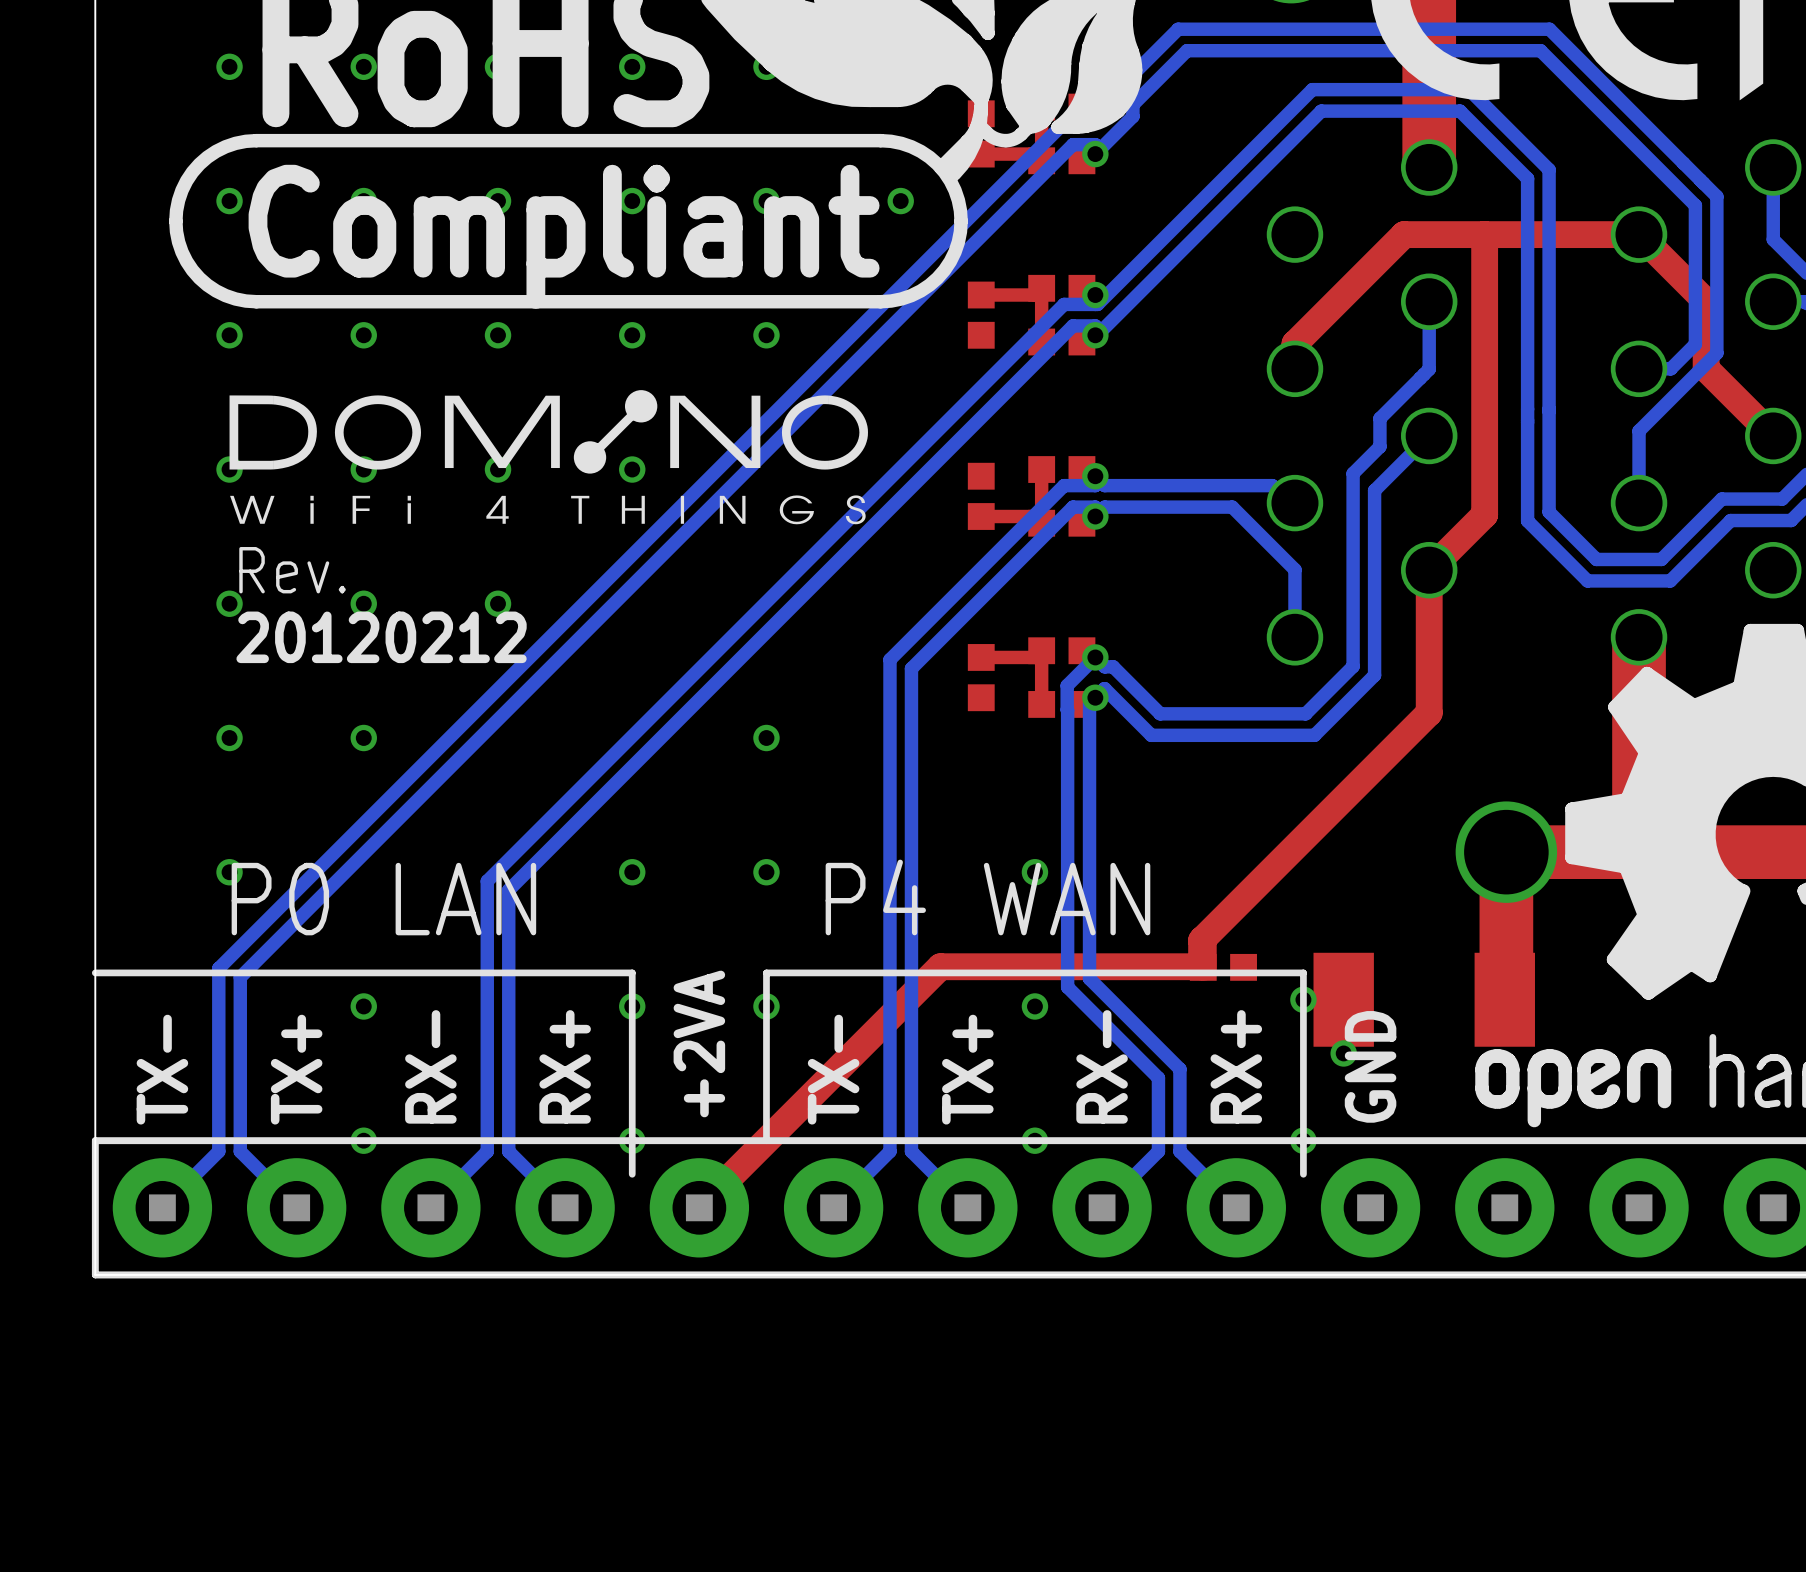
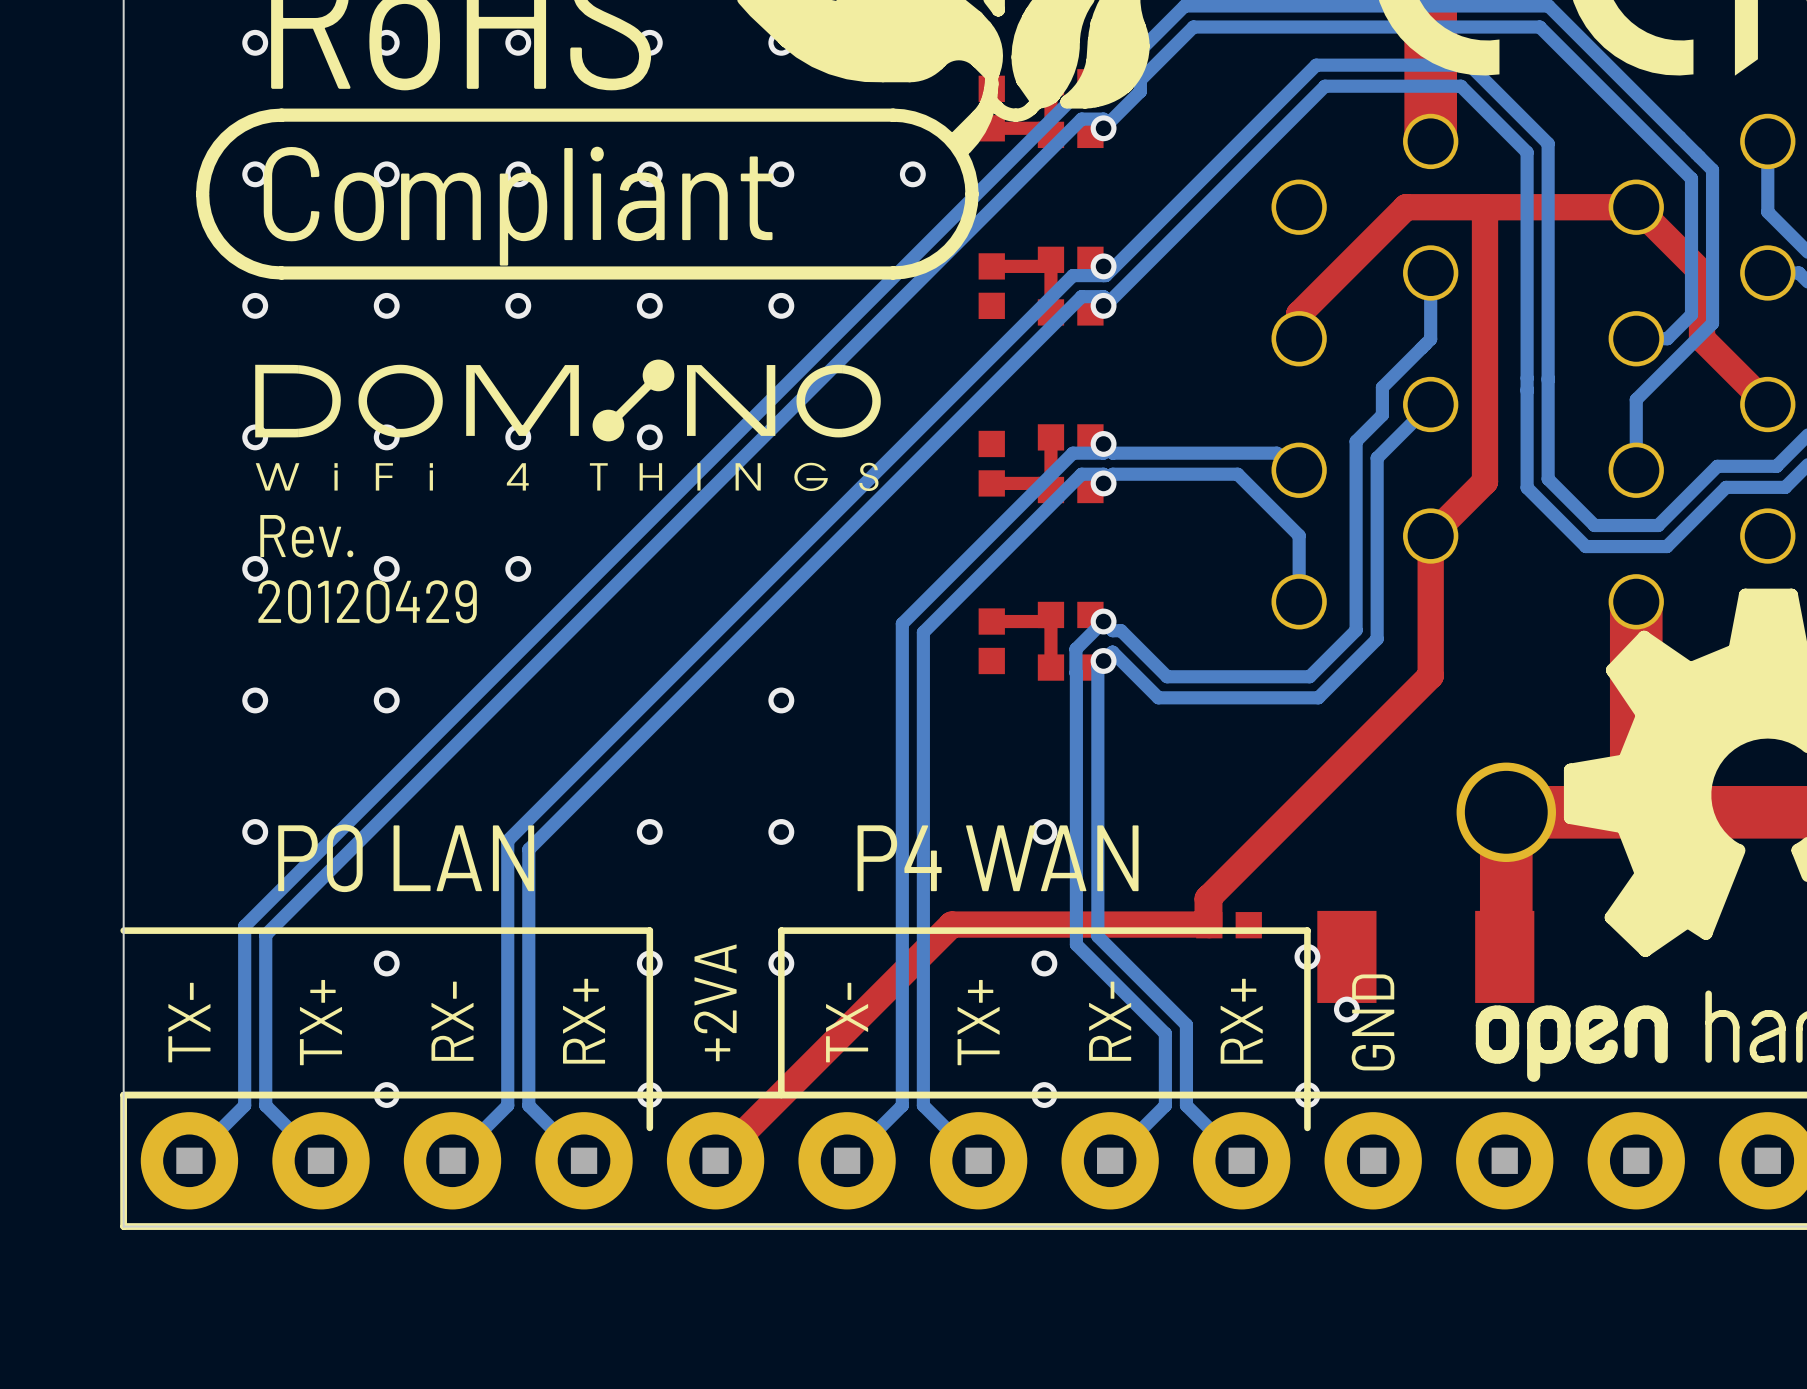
text: 20120212 (381, 637) -> 20120429 (367, 601)

